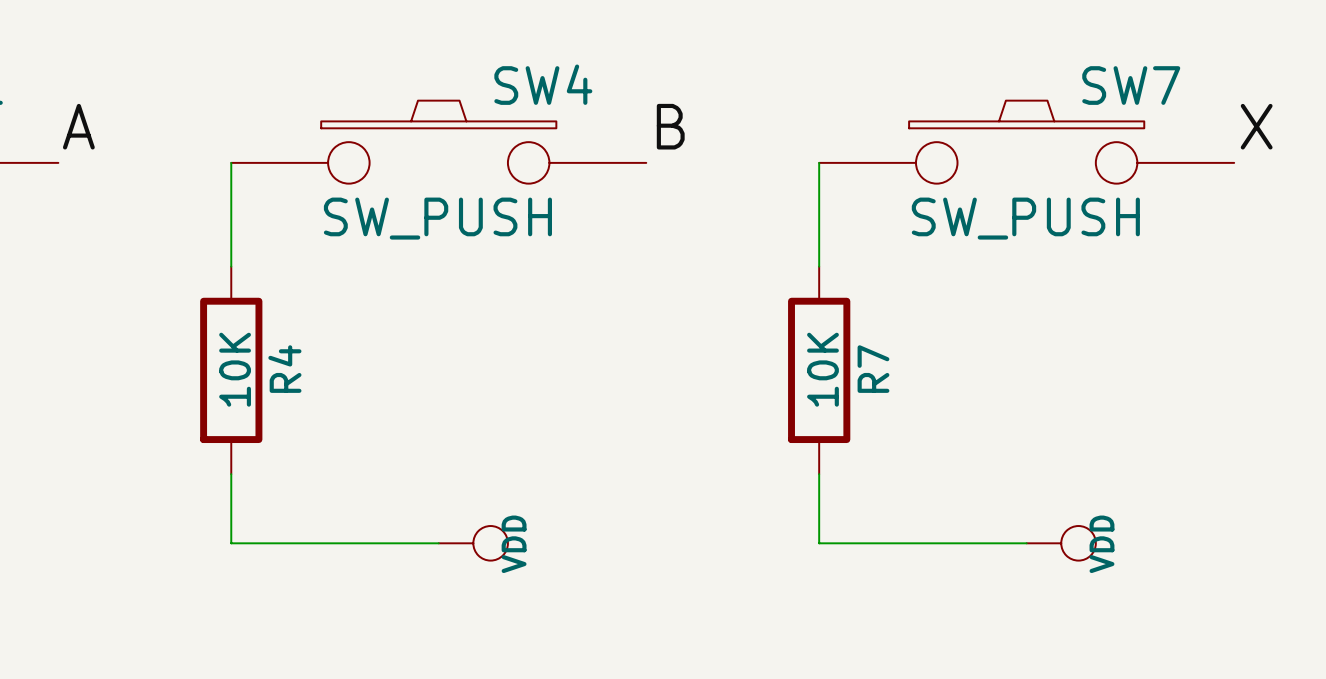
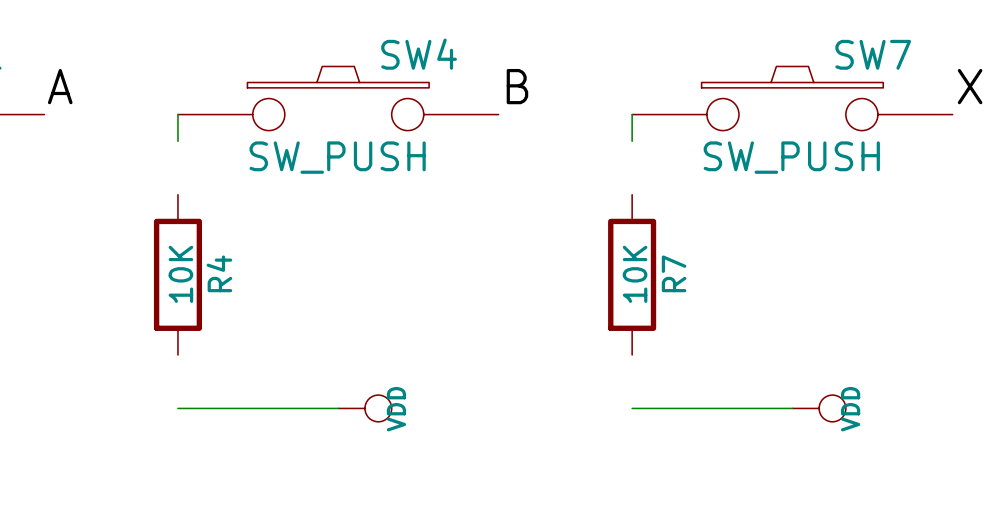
wire: (231, 197) (231, 266) -> none
wire: (819, 197) (819, 266) -> none
wire: (231, 474) (231, 543) -> none
wire: (819, 474) (819, 543) -> none

